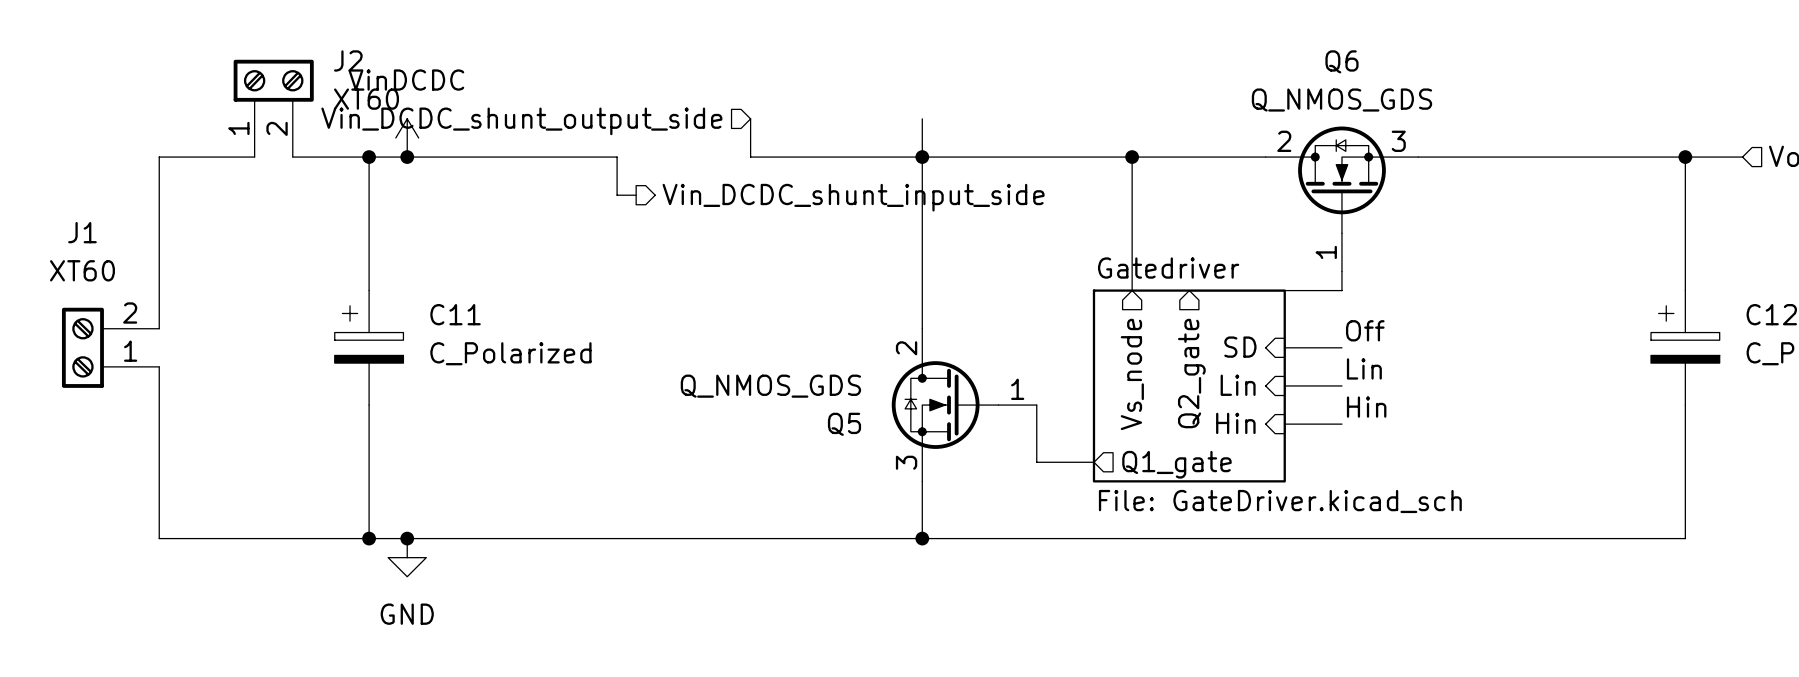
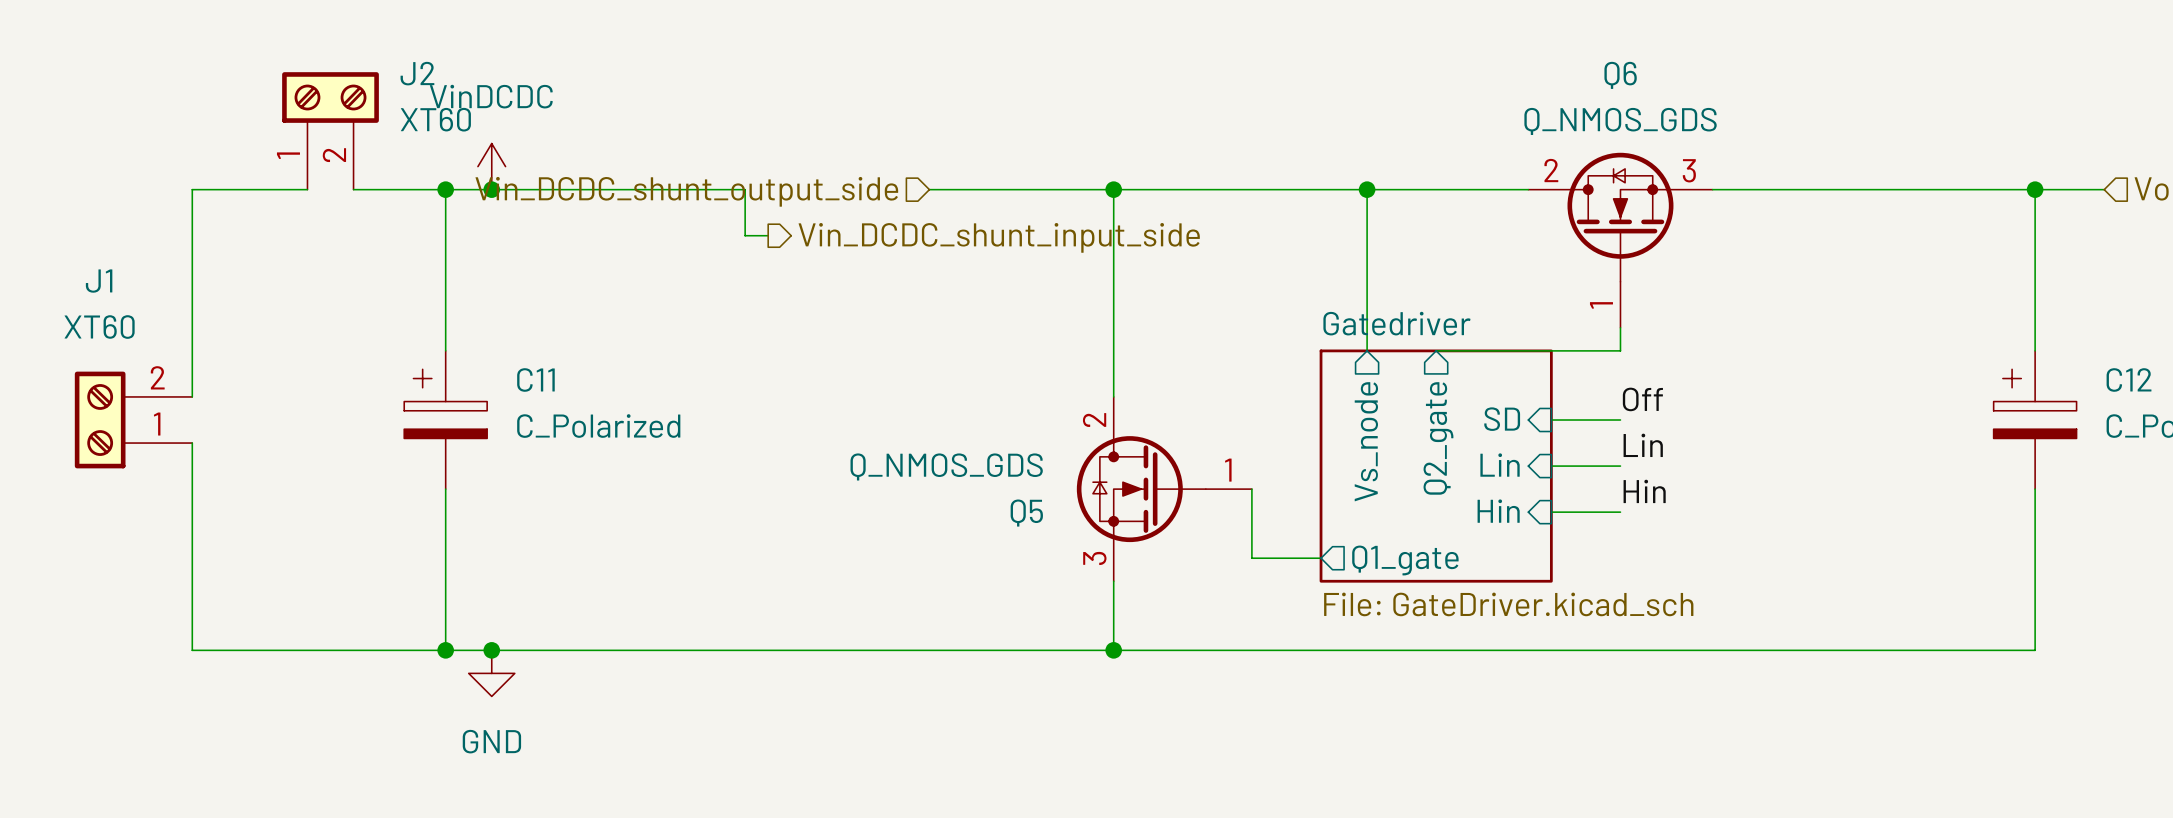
wire: (750, 118) (750, 157) (769, 157) -> none
wire: (922, 118) (922, 157) -> none
hierarchical label position: Vin_DCDC_shunt_output_side (521, 121) -> Vin_DCDC_shunt_output_side (686, 191)

